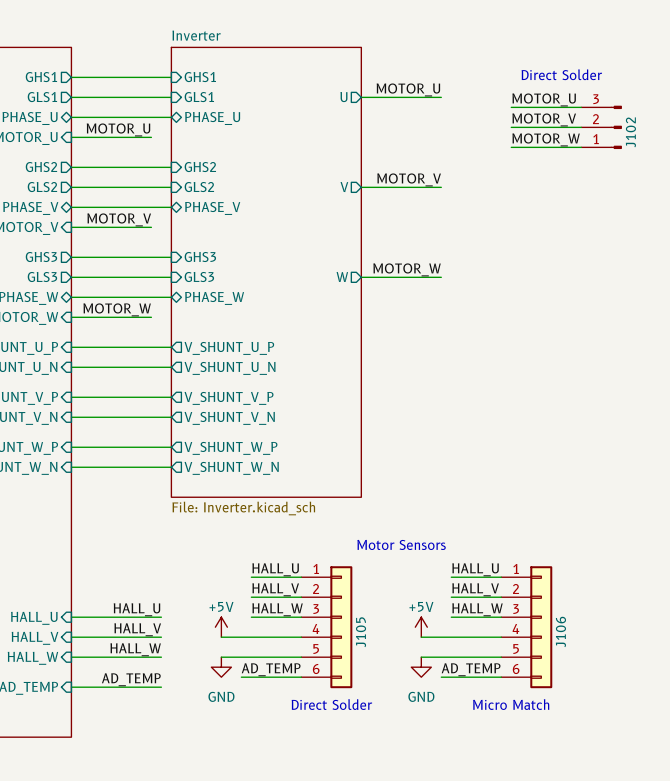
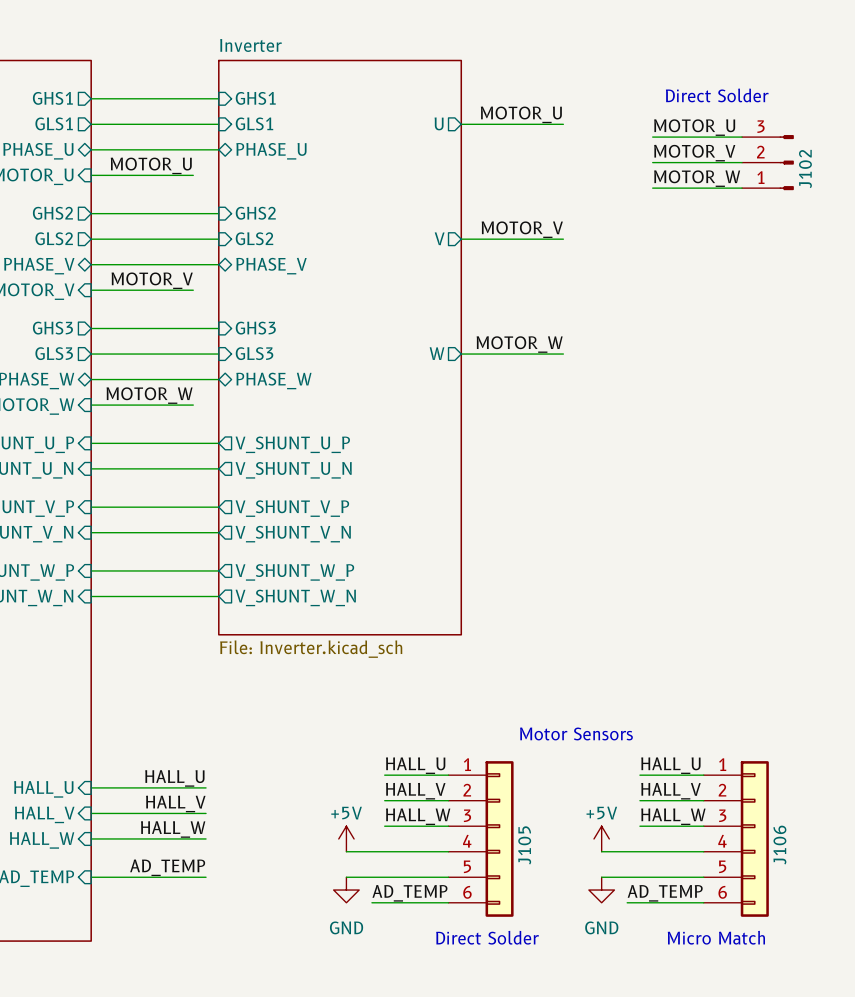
text position: Motor Sensors (401, 544) -> Motor Sensors (576, 733)
label position: HALL_U (275, 569) -> HALL_U (415, 765)
label position: HALL_U (475, 569) -> HALL_U (670, 765)
wire: (251, 577) (301, 577) -> (384, 775) (448, 775)
wire: (451, 577) (501, 577) -> (639, 775) (703, 775)
label position: HALL_V (275, 589) -> HALL_V (415, 791)
label position: HALL_V (475, 589) -> HALL_V (670, 791)
wire: (251, 597) (301, 597) -> (384, 800) (448, 800)
wire: (451, 597) (501, 597) -> (639, 800) (703, 800)
label position: HALL_W (277, 609) -> HALL_W (418, 816)
label position: HALL_W (477, 609) -> HALL_W (673, 816)
wire: (251, 617) (301, 617) -> (384, 826) (448, 826)
wire: (451, 617) (501, 617) -> (639, 826) (703, 826)
power symbol position: +5V (221, 627) -> +5V (346, 838)
J105 position: (326, 627) -> (481, 838)
power symbol position: +5V (421, 627) -> +5V (601, 838)
J106 position: (526, 627) -> (736, 838)
wire: (221, 637) (301, 637) -> (346, 851) (448, 851)
wire: (421, 637) (501, 637) -> (601, 851) (703, 851)
wire: (221, 657) (301, 657) -> (346, 877) (448, 877)
wire: (421, 657) (501, 657) -> (601, 877) (703, 877)
power symbol position: GND (221, 667) -> GND (346, 890)
power symbol position: GND (421, 667) -> GND (601, 890)
label position: AD_TEMP (271, 669) -> AD_TEMP (409, 893)
label position: AD_TEMP (471, 669) -> AD_TEMP (665, 893)
wire: (241, 677) (301, 677) -> (371, 902) (448, 902)
wire: (441, 677) (501, 677) -> (627, 902) (703, 902)
text position: Direct Solder (331, 704) -> Direct Solder (487, 937)
text position: Micro Match (511, 704) -> Micro Match (716, 937)

